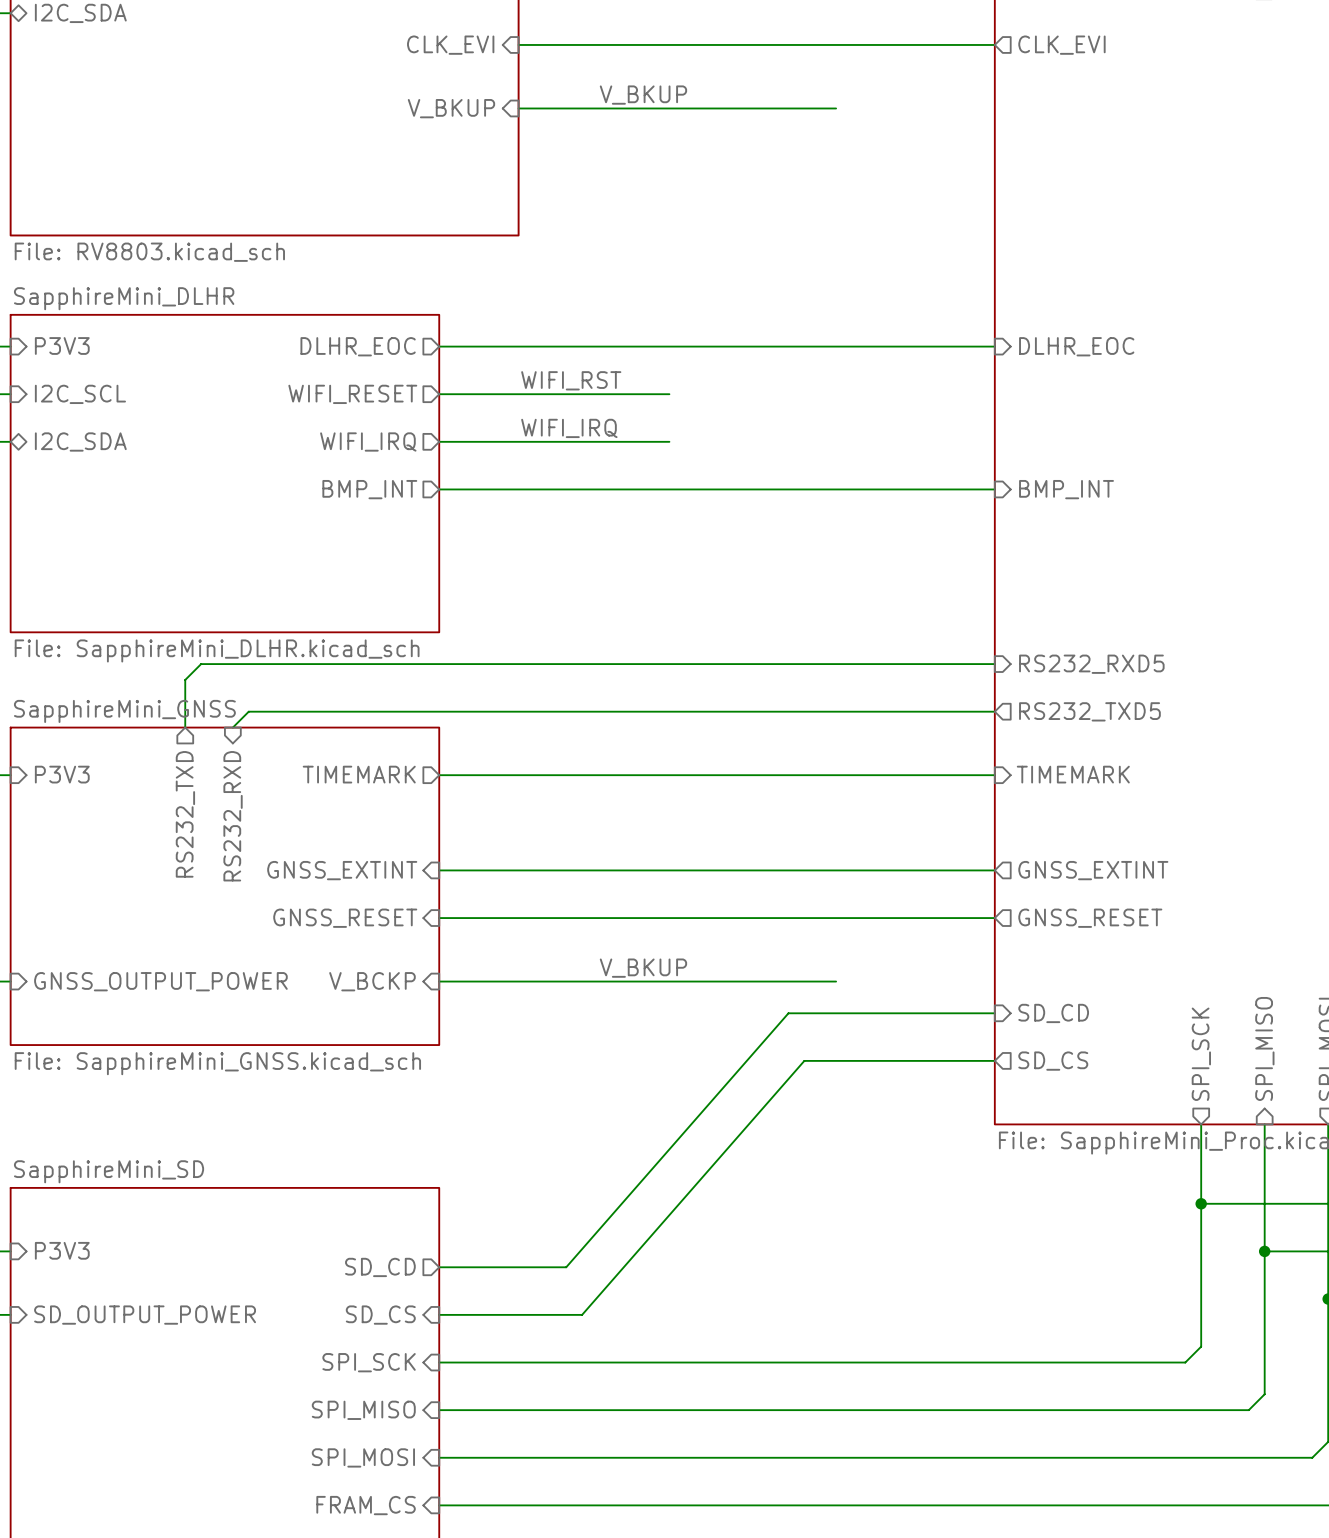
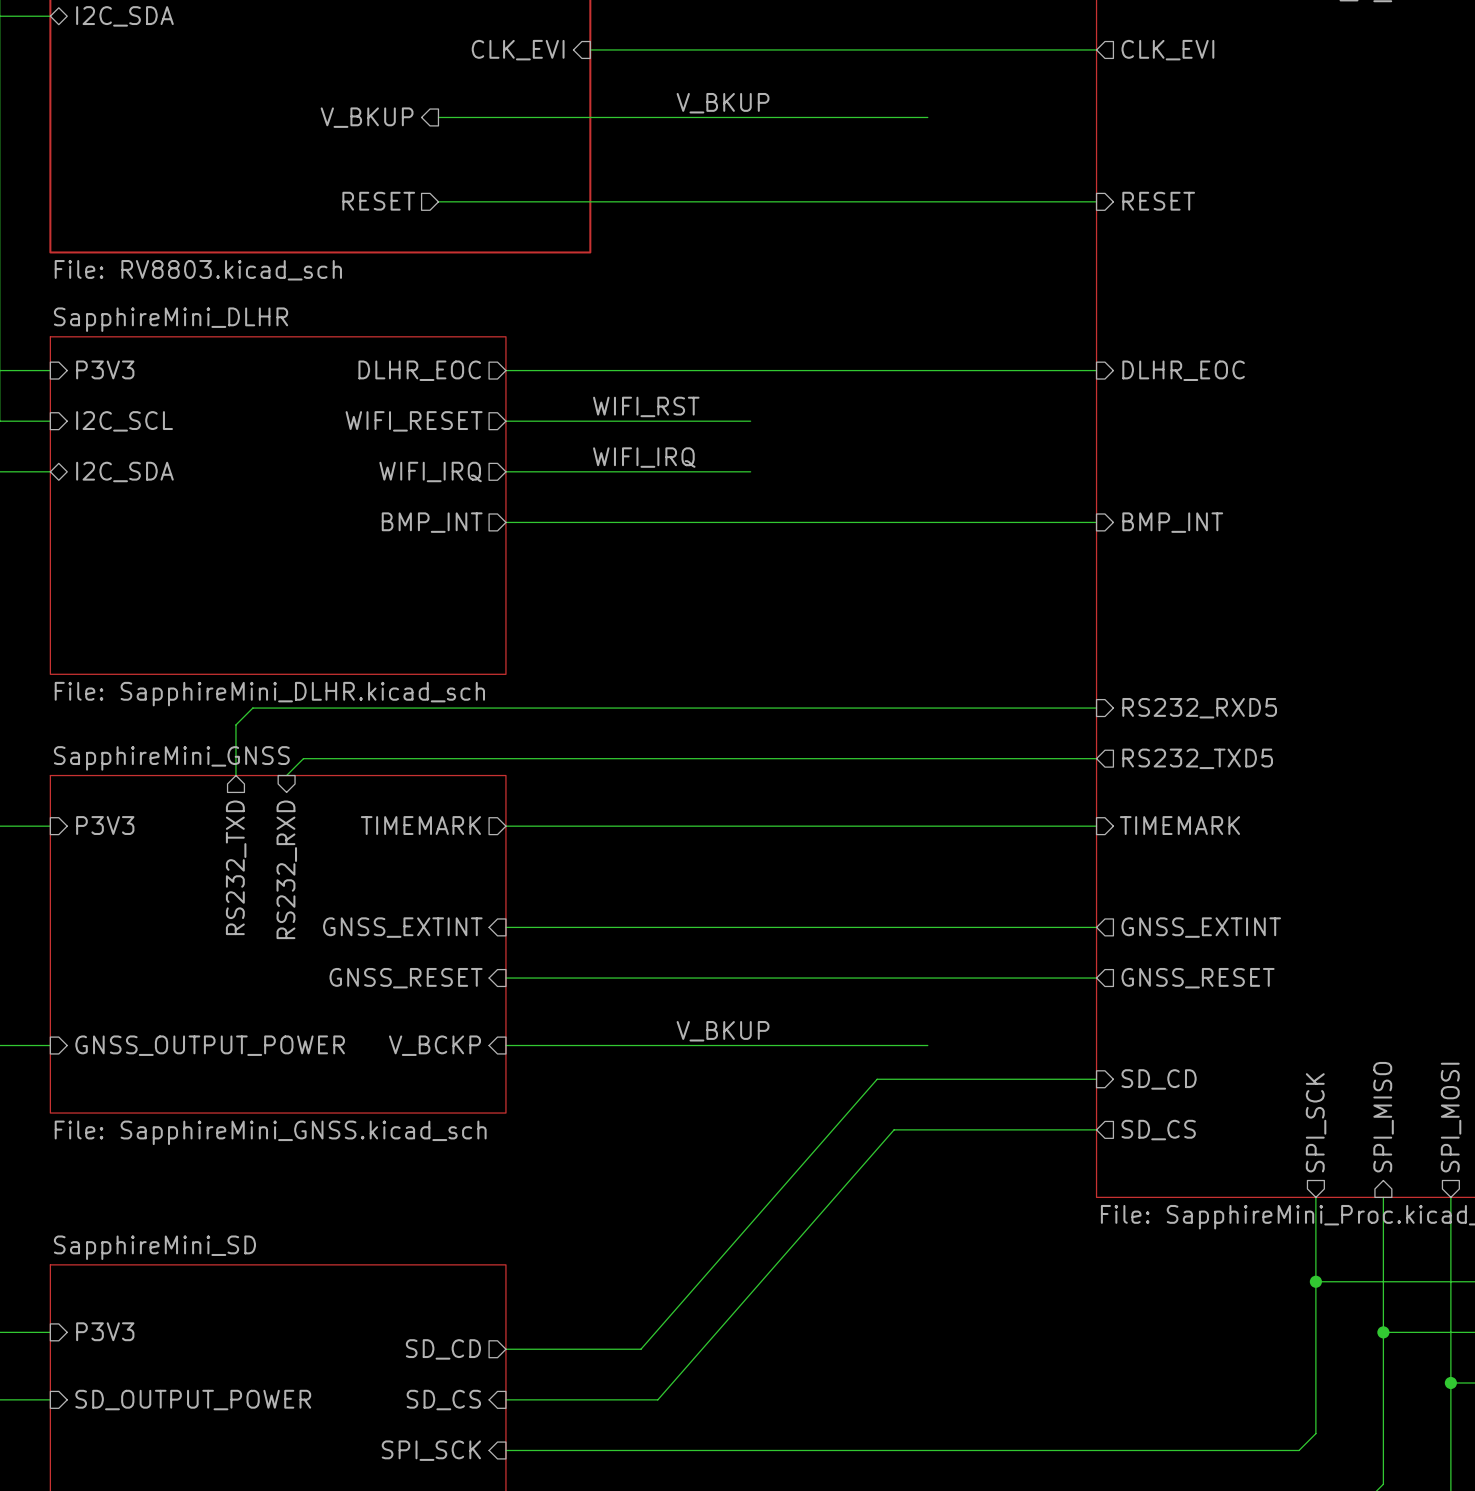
wire: none -> (438, 117) (590, 117)
sheet pin position: V_BKUP (451, 108) -> V_BKUP (367, 117)
sheet pin: none -> RESET (378, 201)
wire: none -> (438, 201) (1096, 201)
sheet pin: none -> RESET (1158, 201)

